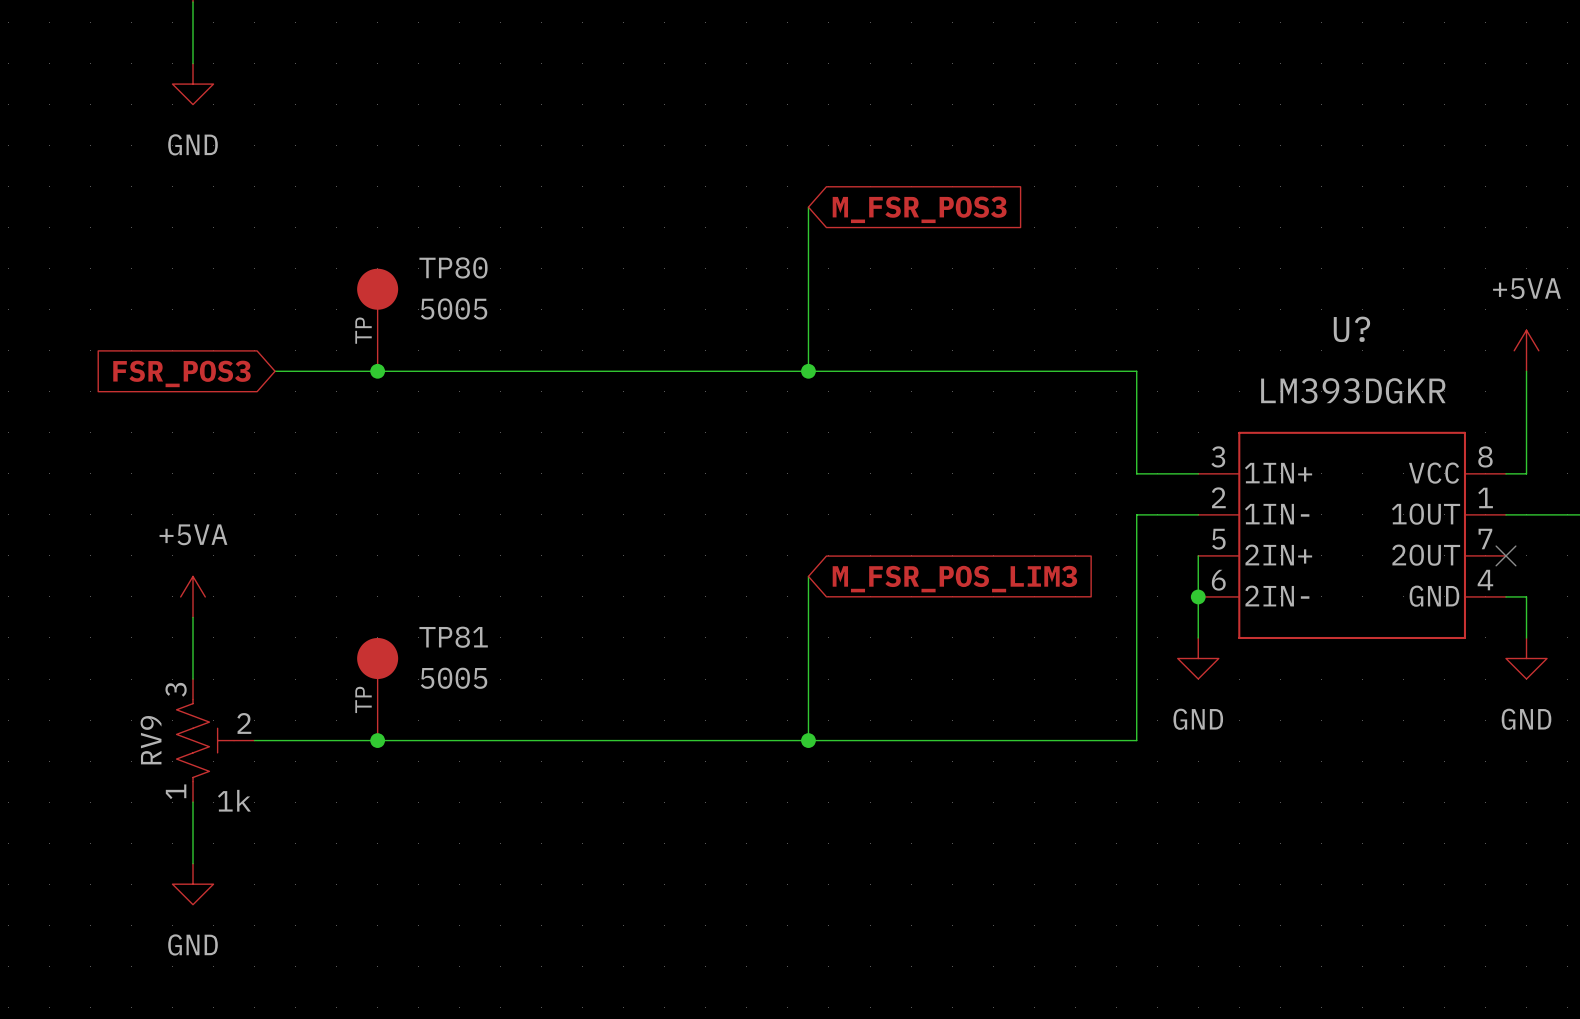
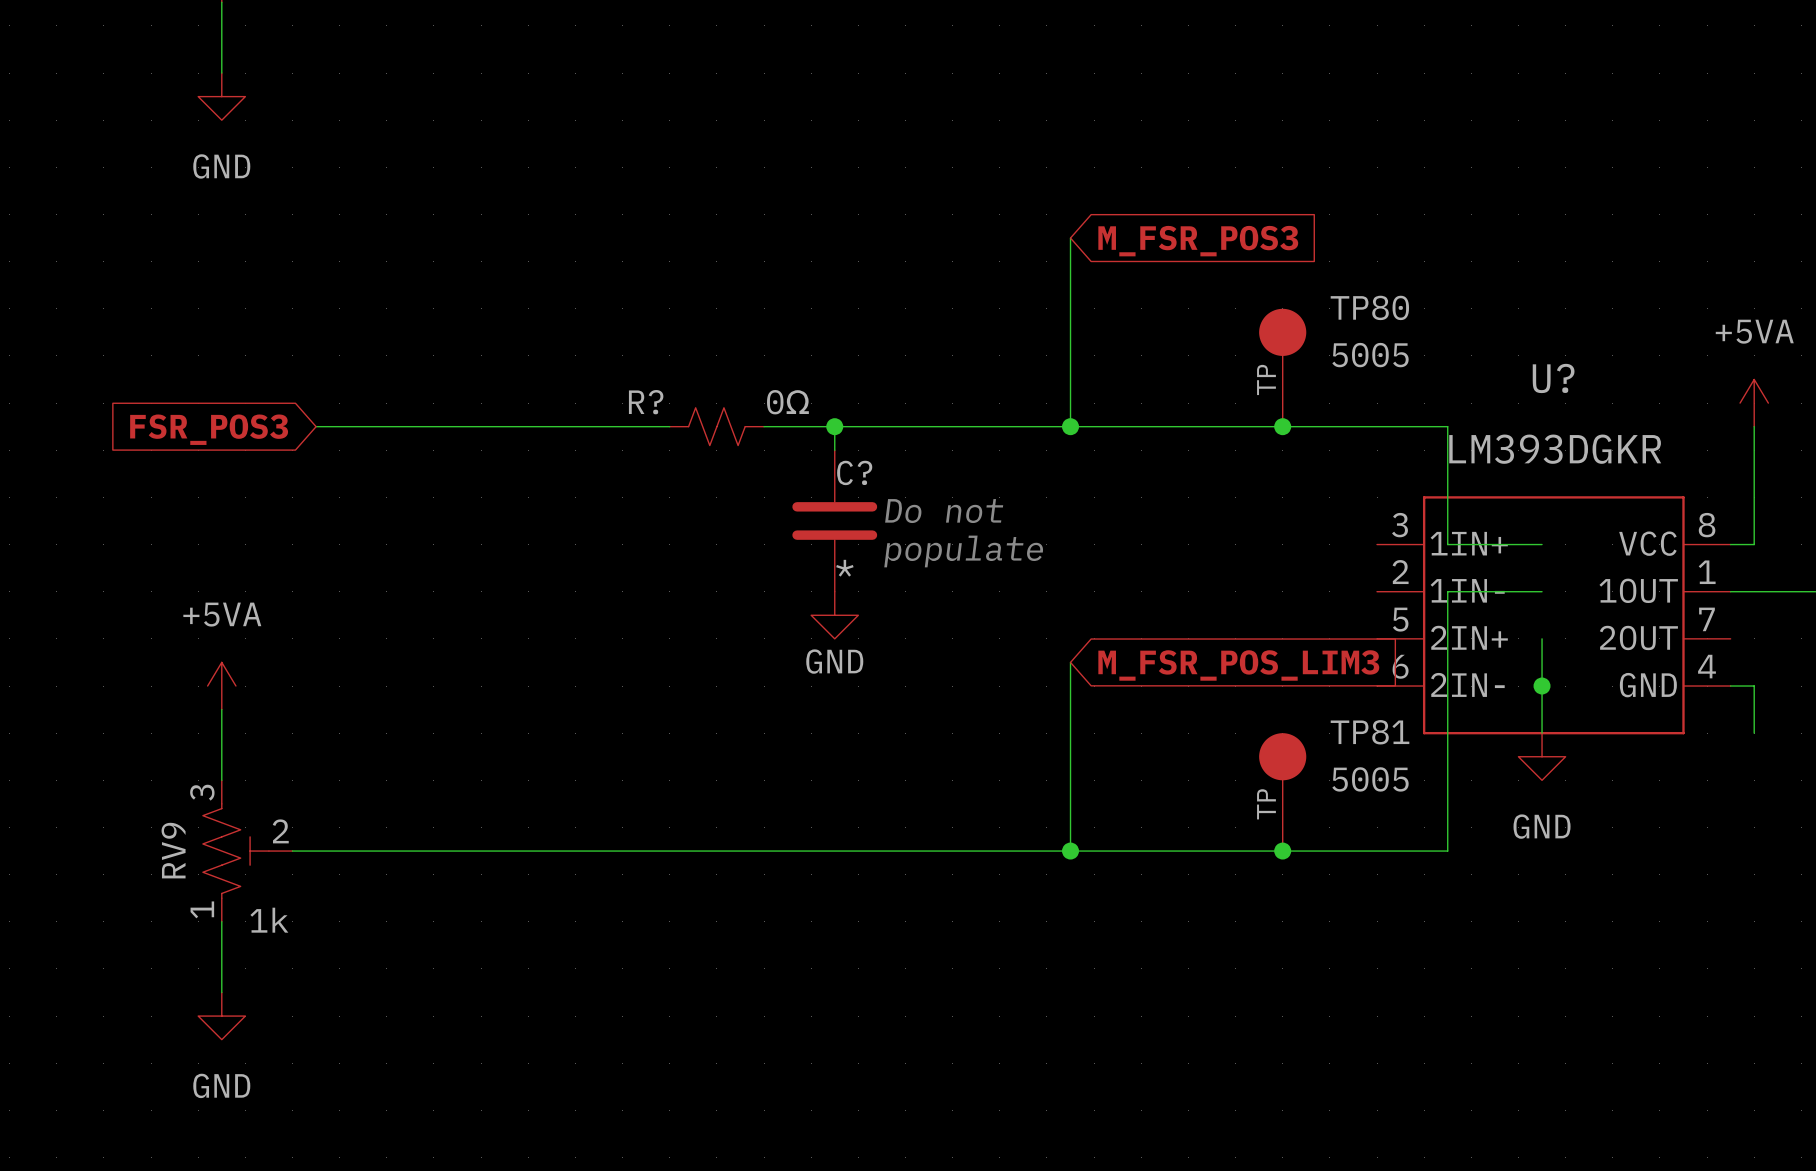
wire: (808, 207) (808, 371) -> (1070, 238) (1070, 426)
global label position: M_FSR_POS3 (919, 209) -> M_FSR_POS3 (1198, 241)
TP80 position: (377, 320) -> (1282, 367)
junction: (377, 371) -> none
wire: (582, 371) (664, 371) -> none
R?: none -> 0Ω (716, 426)
wire: none -> (834, 426) (834, 450)
junction: none -> (834, 426)
junction: (808, 371) -> none
junction: none -> (1070, 426)
junction: none -> (1282, 426)
wire: (1136, 371) (1136, 473) (1198, 473) -> (1306, 426) (1447, 426) (1447, 544) (1542, 544)
text: none -> Do not (944, 511)
C?: none -> * (834, 520)
text: none -> populate (963, 551)
wire: (1198, 514) (1136, 514) (1136, 740) -> (1542, 591) (1447, 591) (1447, 851) (1306, 851)
power symbol: none -> GND (834, 615)
wire: (1198, 555) (1198, 637) -> (1542, 638) (1542, 733)
no-connect mark: (1505, 555) -> none
wire: (808, 576) (808, 740) -> (1070, 662) (1070, 851)
global label position: M_FSR_POS_LIM3 (954, 579) -> M_FSR_POS_LIM3 (1238, 665)
junction: (1198, 596) -> none
junction: none -> (1542, 686)
power symbol: GND (1198, 658) -> none
power symbol: none -> GND (1542, 756)
power symbol: GND (1526, 658) -> none
TP81 position: (377, 689) -> (1282, 792)
junction: (377, 740) -> none
junction: (808, 740) -> none
junction: none -> (1070, 851)
junction: none -> (1282, 851)

